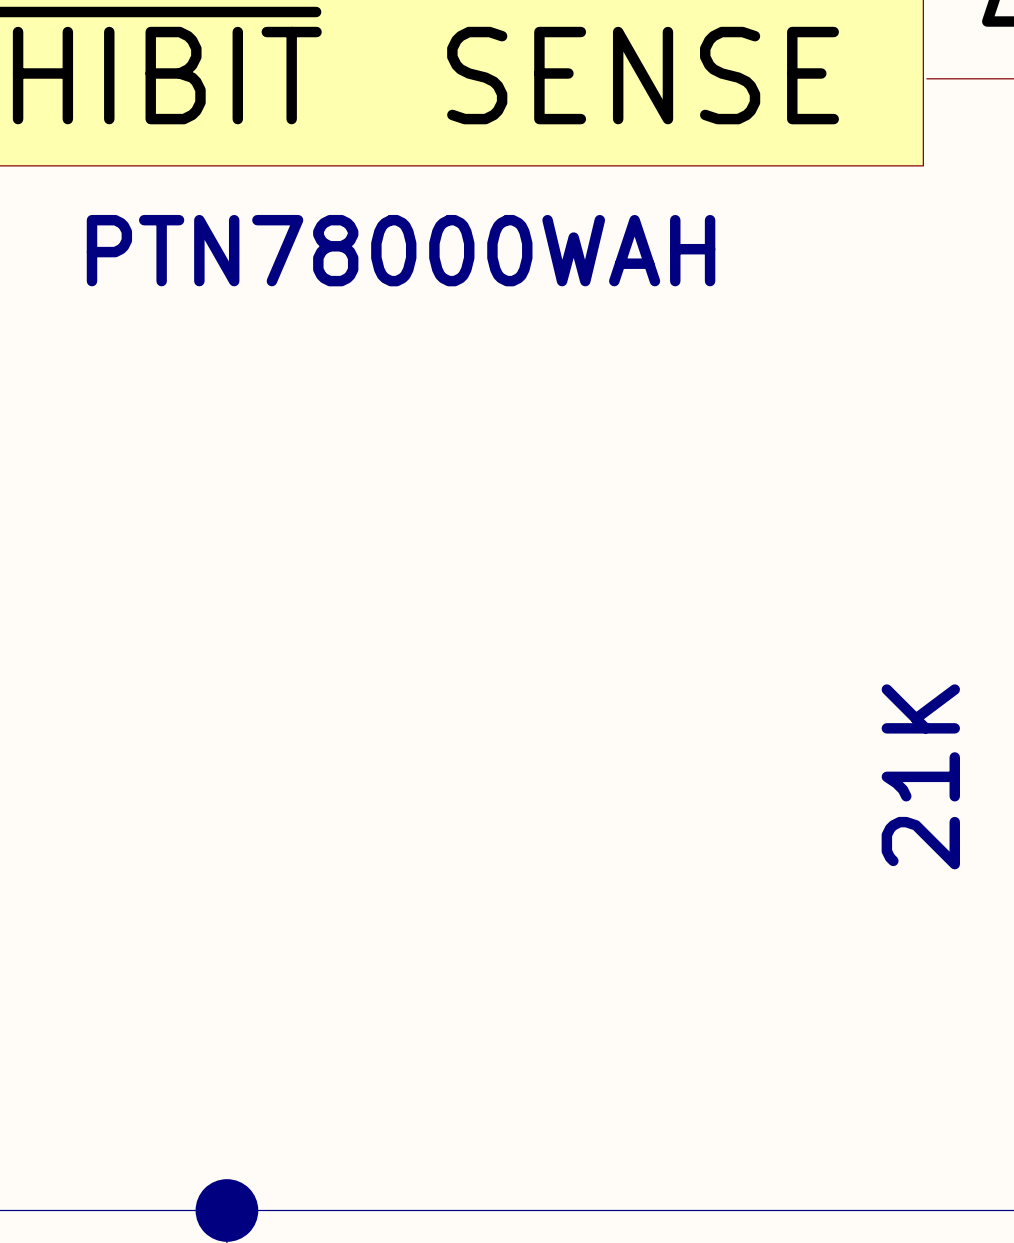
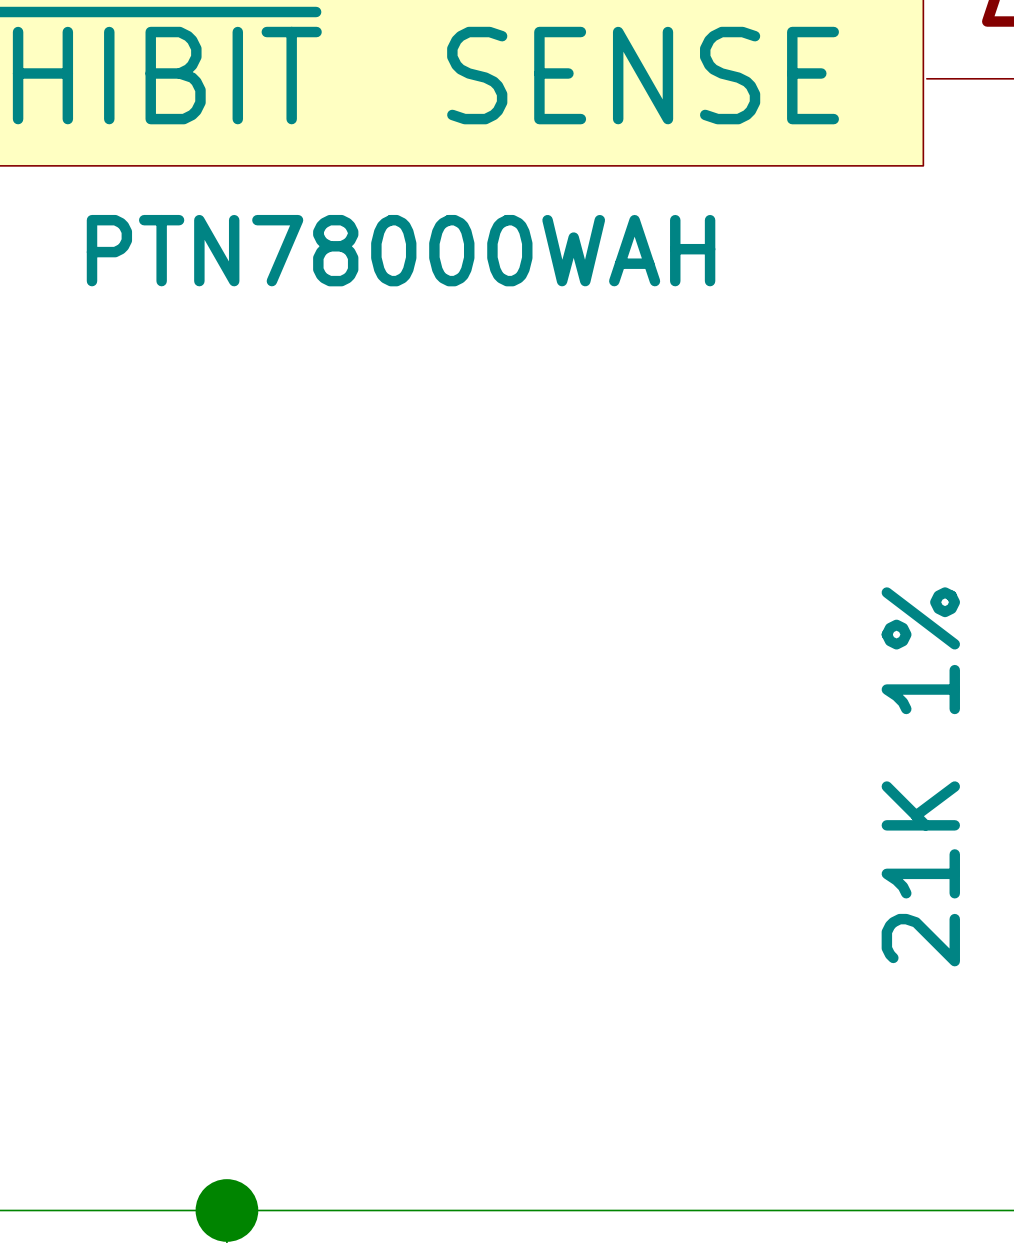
part value: 21K (920, 776) -> 21K 1% (920, 776)

